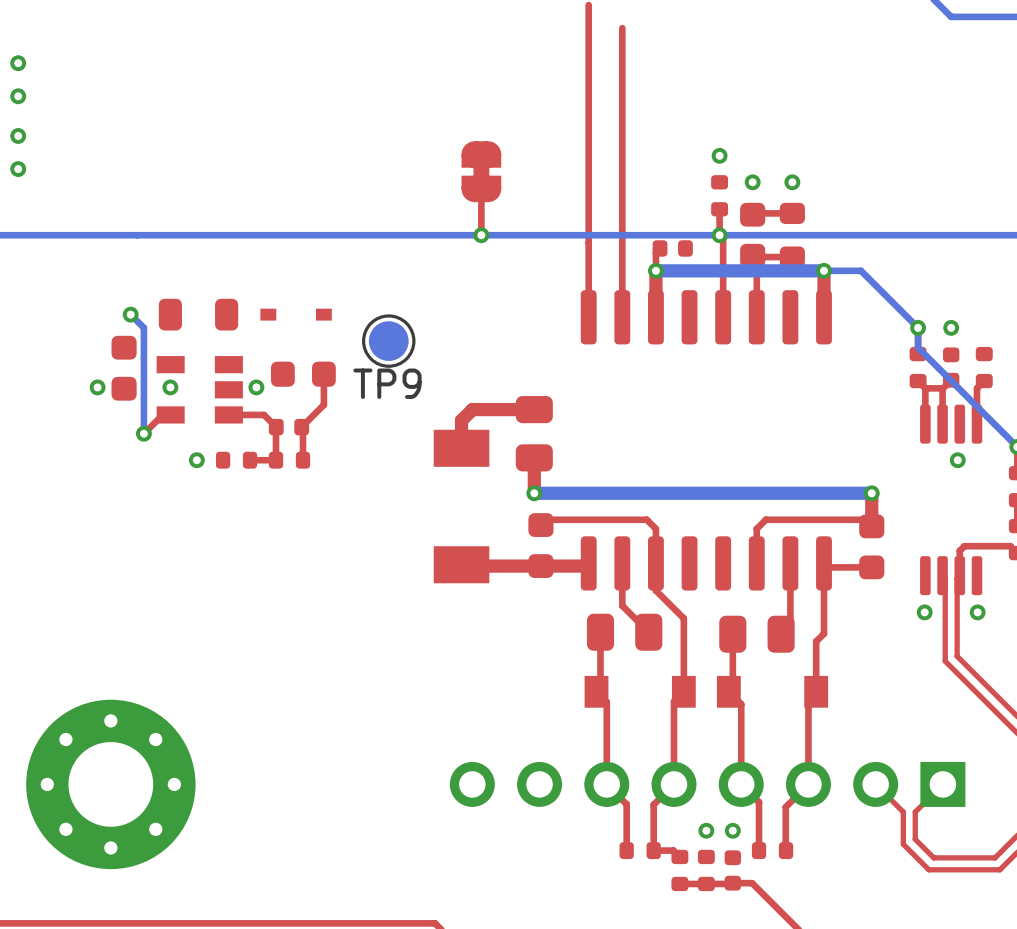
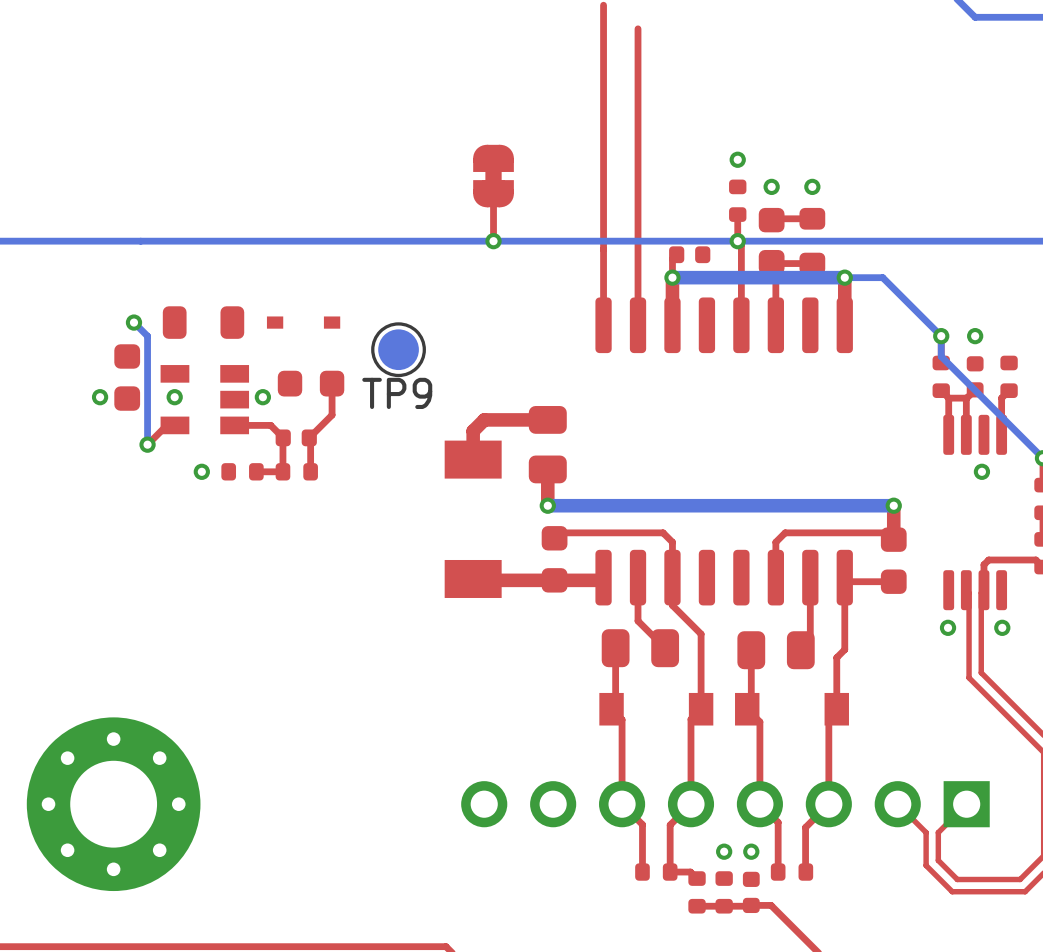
via: (18, 63) -> none
via: (18, 96) -> none
via: (18, 135) -> none
via: (18, 169) -> none

